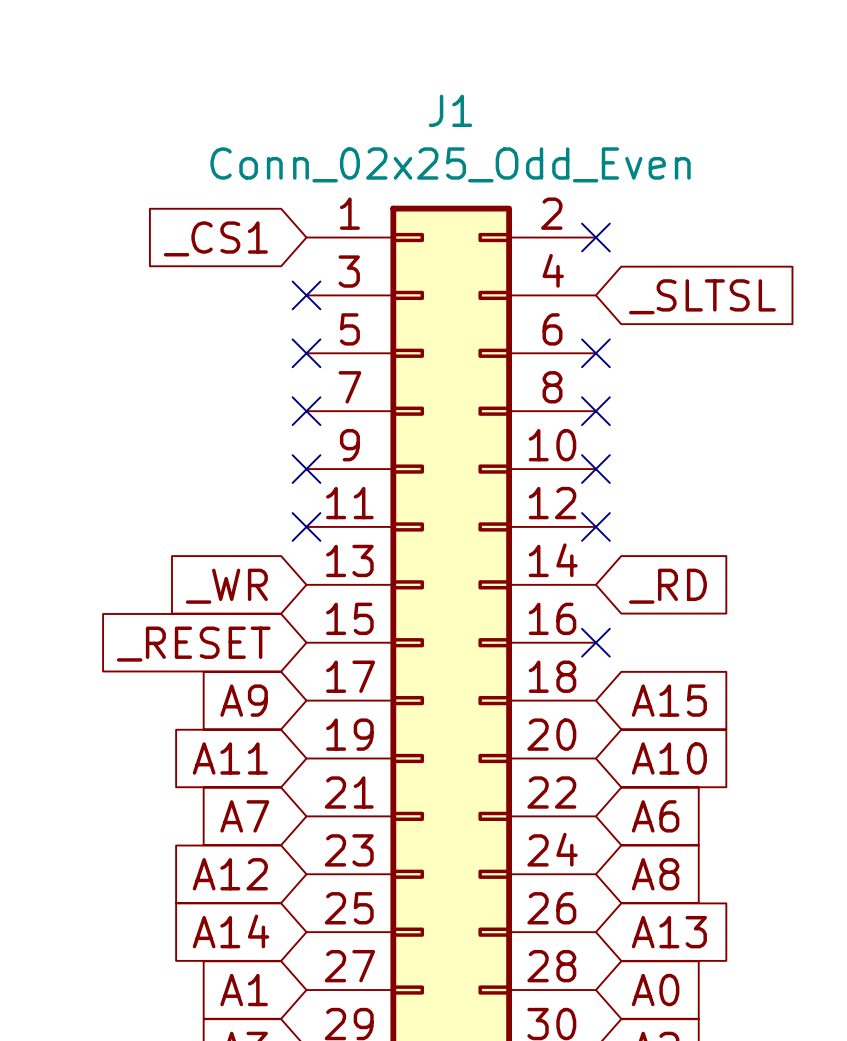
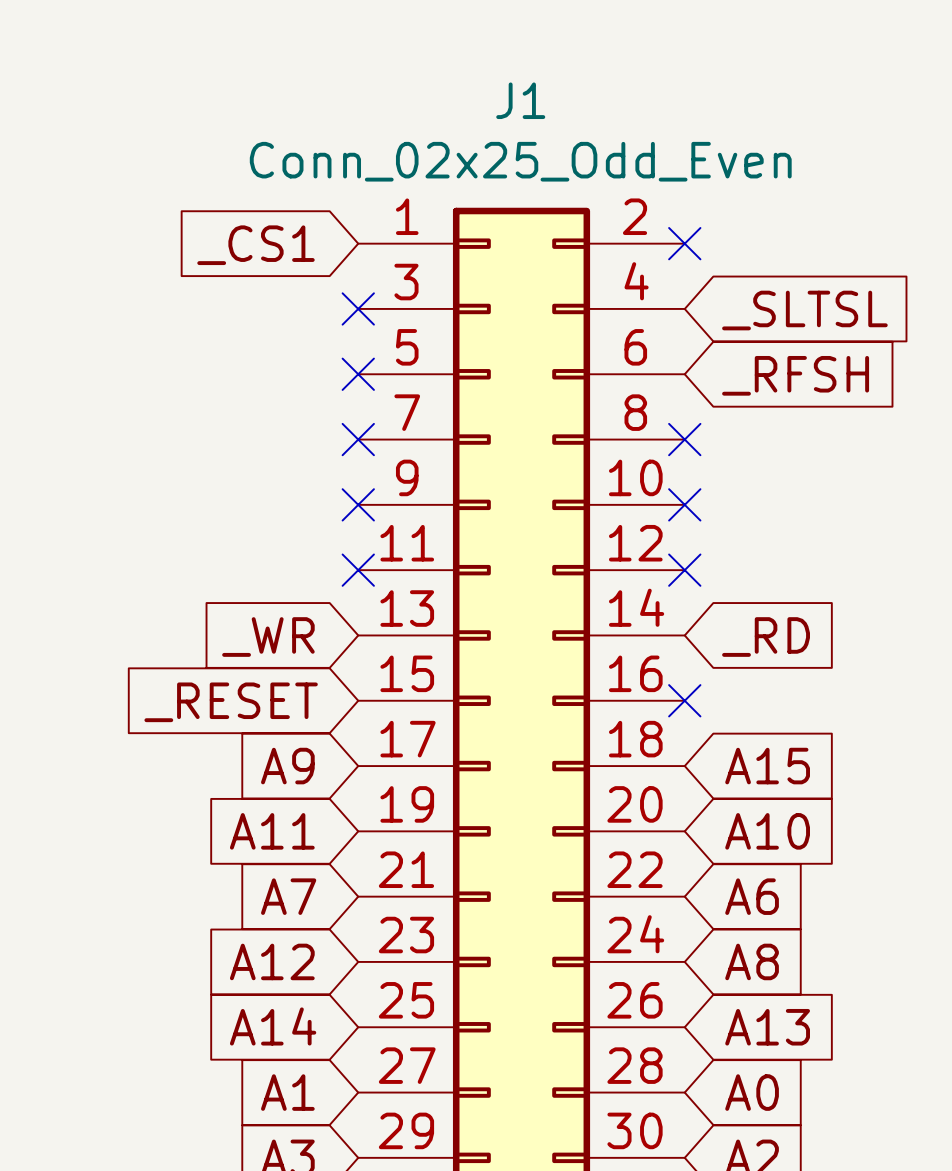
no-connect mark: (595, 353) -> none
global label: none -> _RFSH (795, 375)

